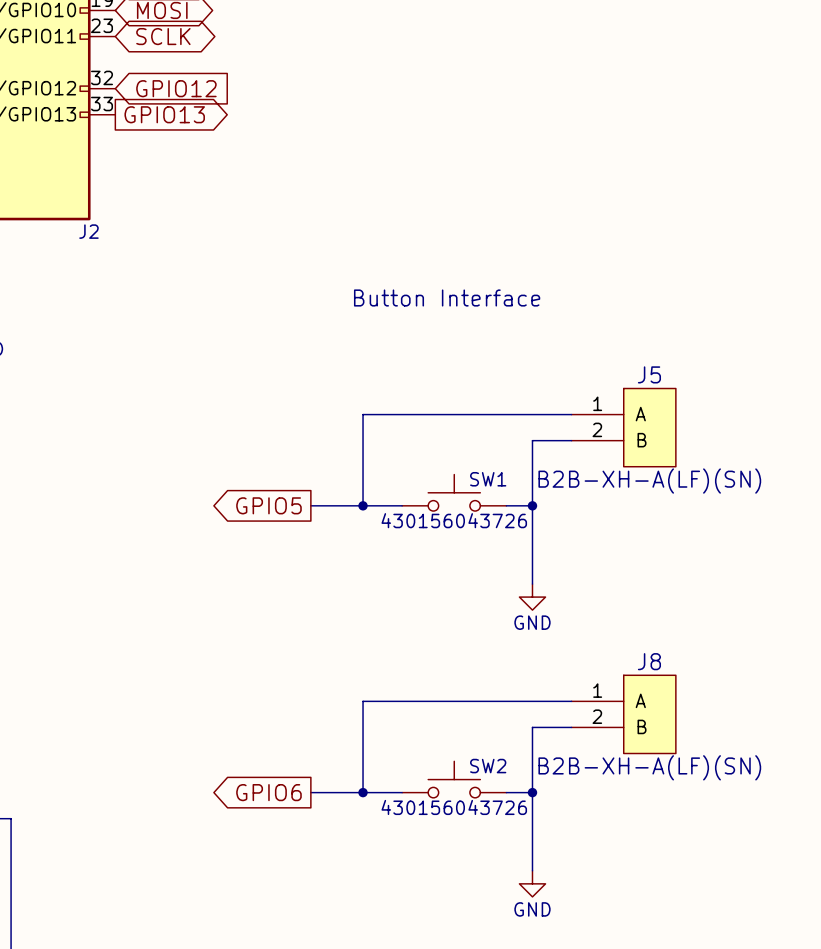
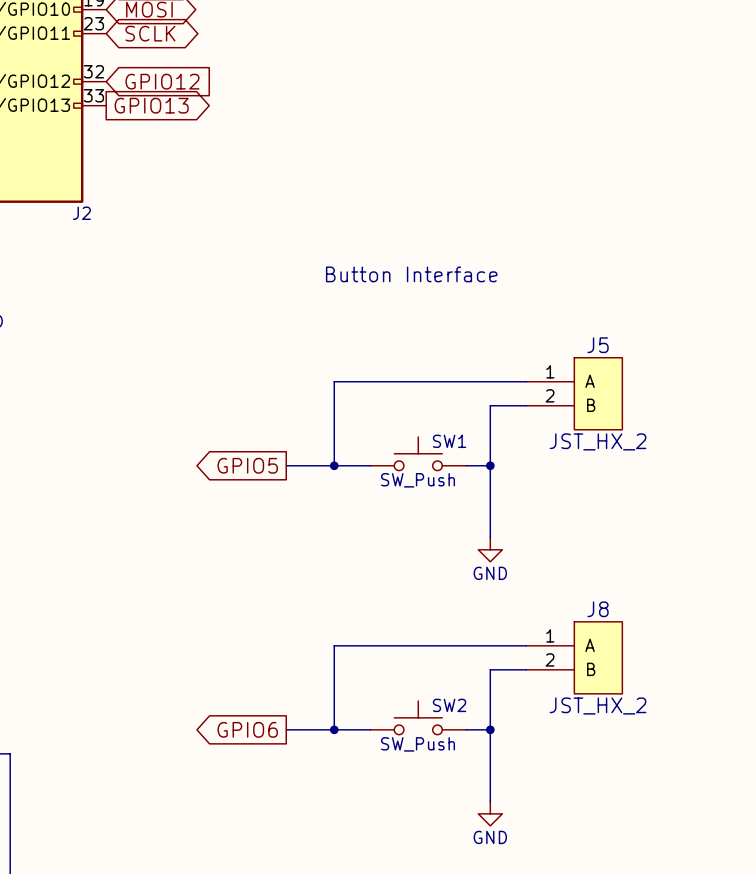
J5 value: B2B-XH-A(LF)(SN) (649, 481) -> JST_HX_2 (598, 441)
SW1 value: 430156043726 (454, 520) -> SW_Push (418, 480)
J8 value: B2B-XH-A(LF)(SN) (649, 767) -> JST_HX_2 (598, 705)
SW2 value: 430156043726 (454, 807) -> SW_Push (418, 744)

